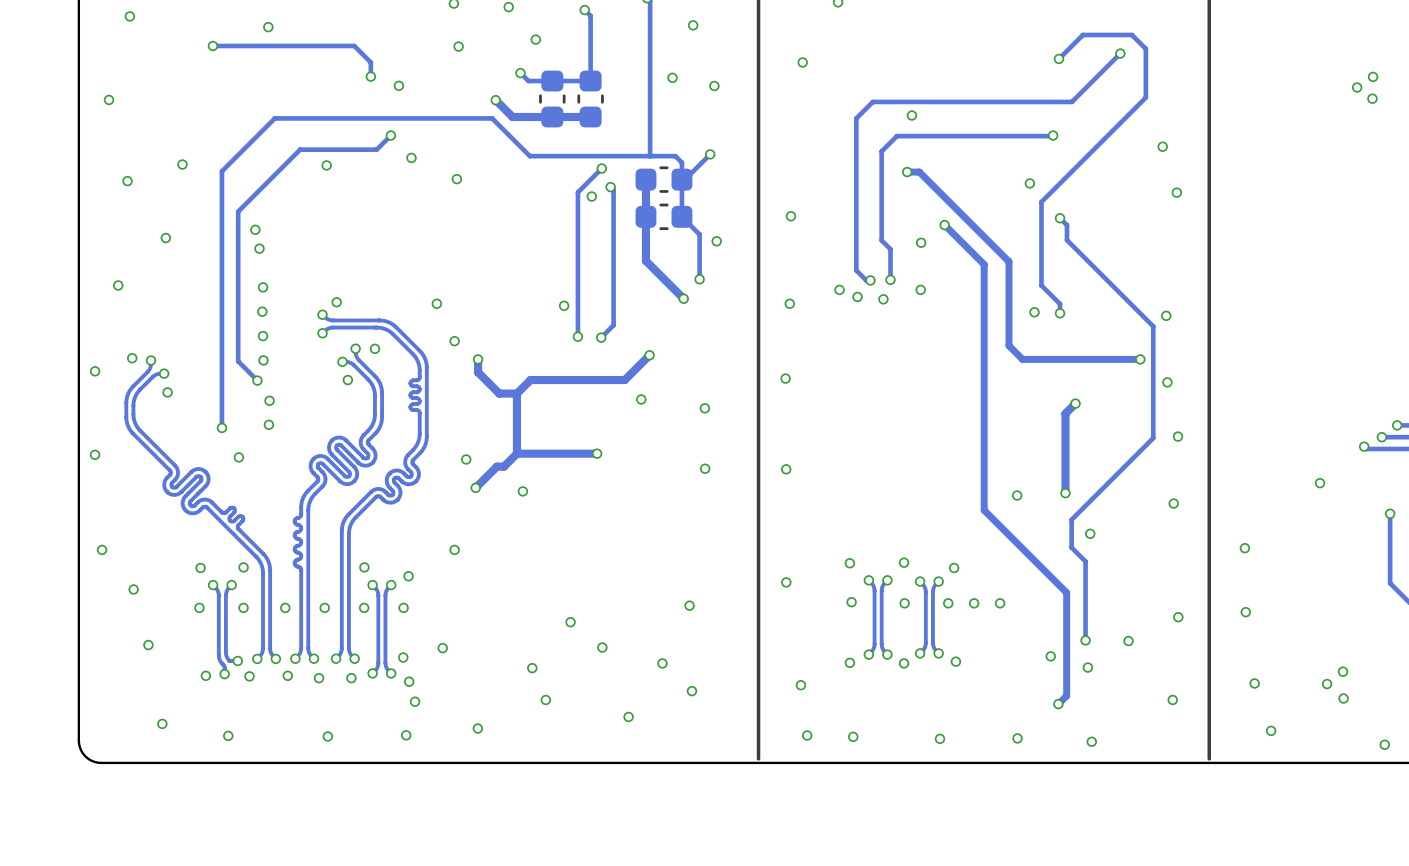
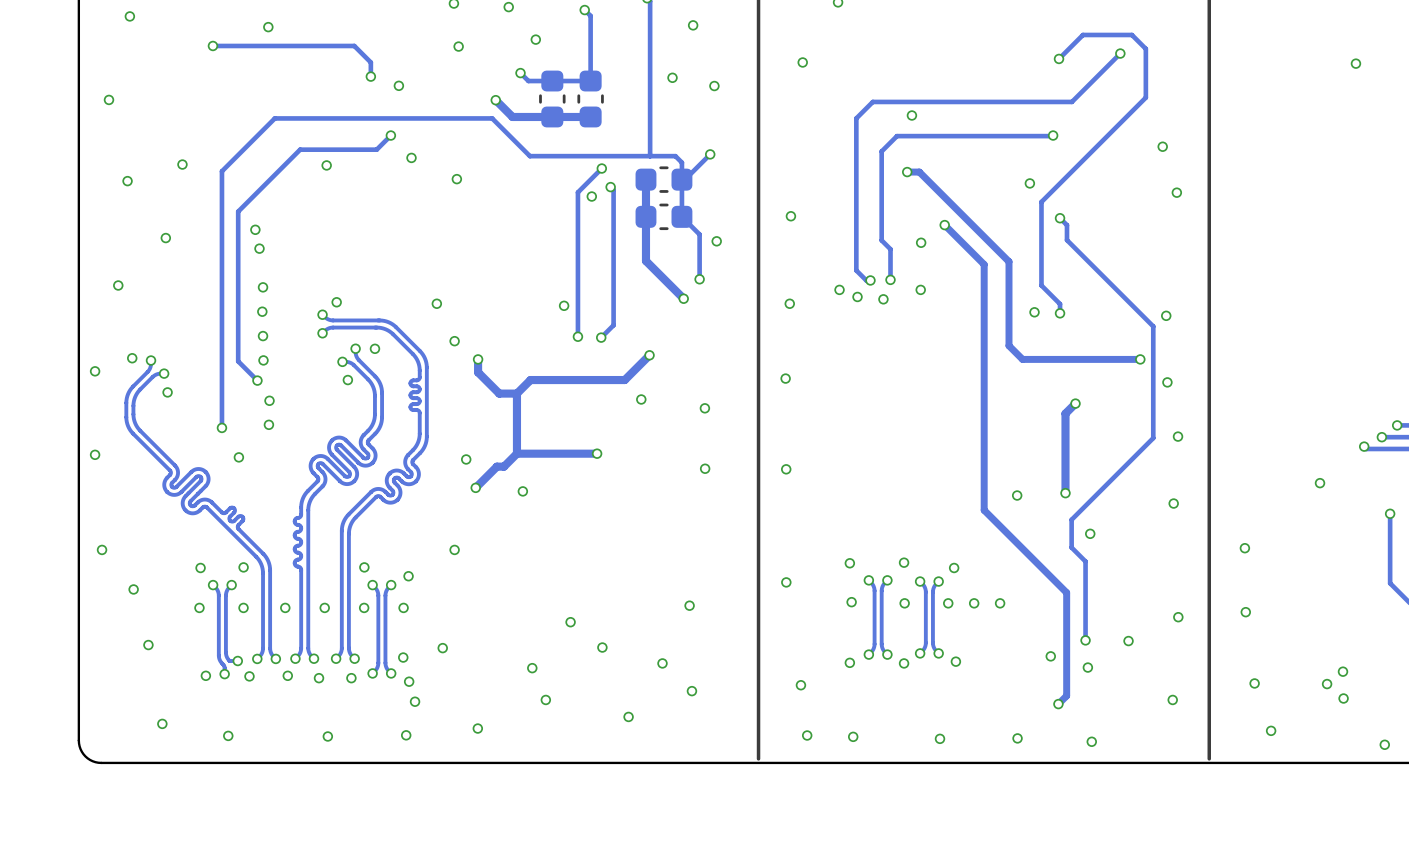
via: none -> (1355, 63)
via: (1373, 76) -> none
via: (1357, 87) -> none
via: (1372, 98) -> none

